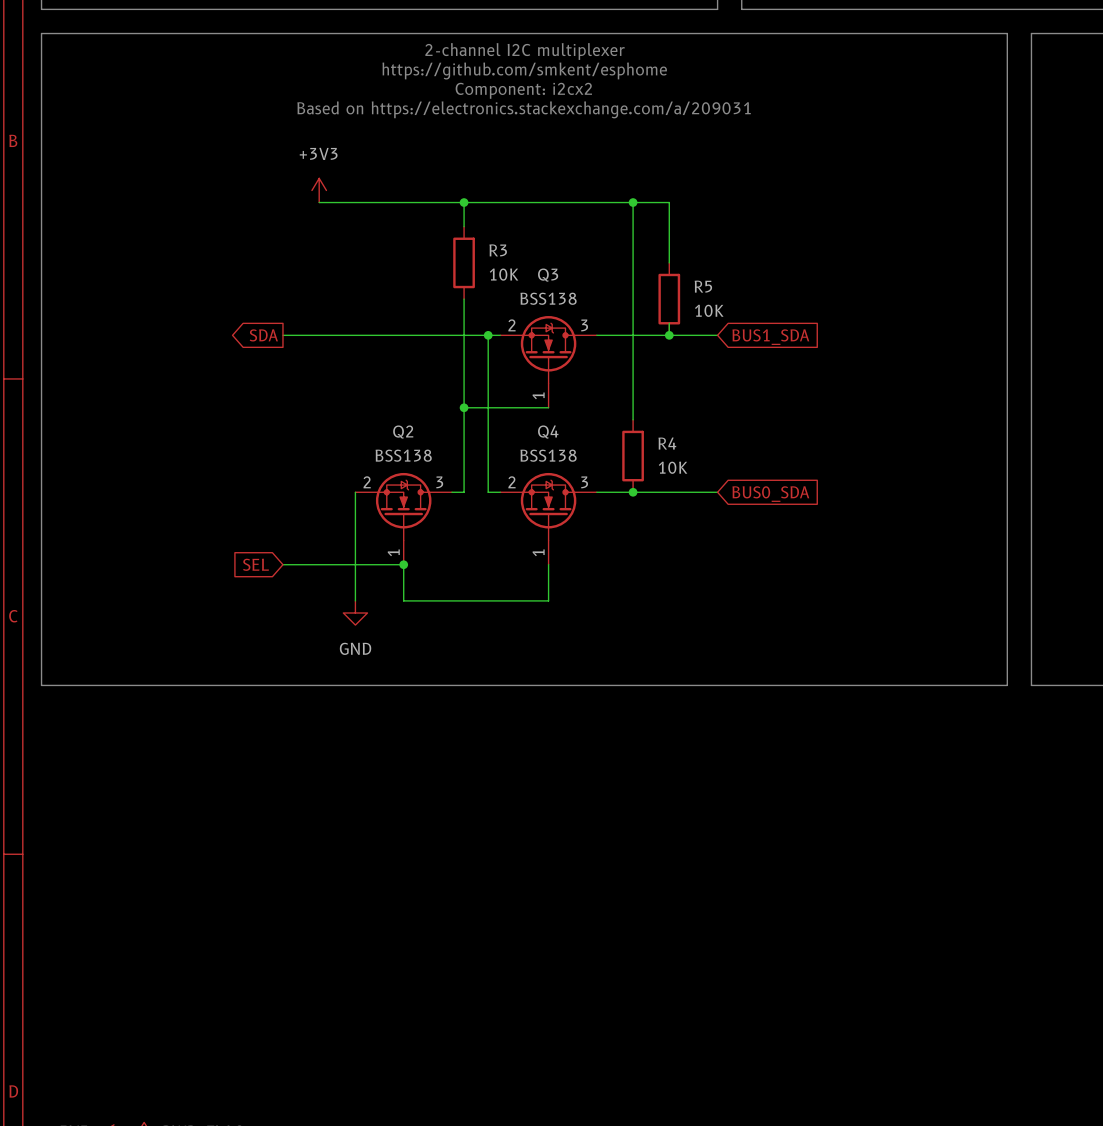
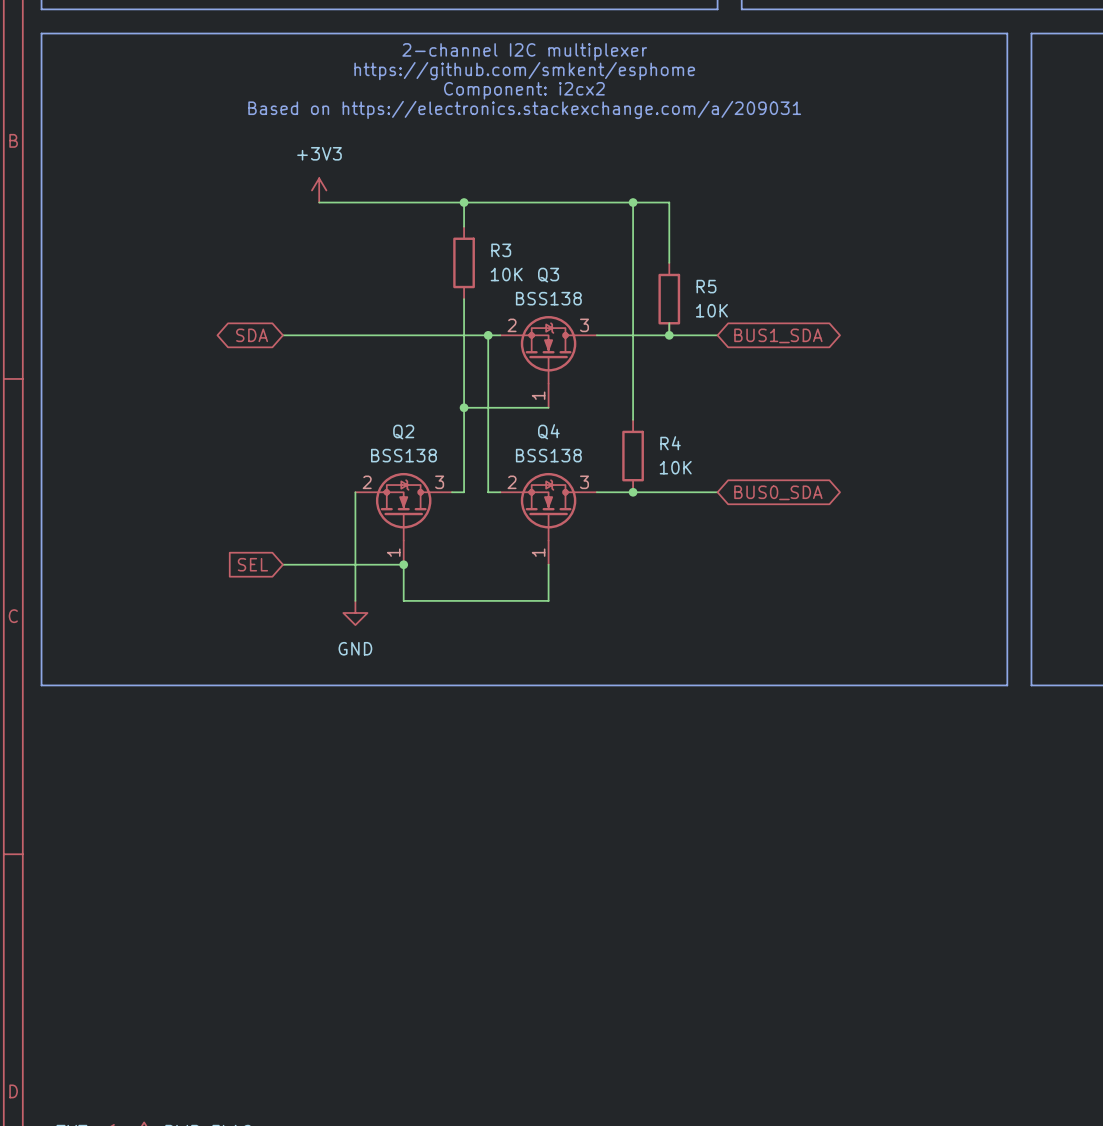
global label shape: output (263, 335) -> bidirectional (252, 335)
global label shape: input (770, 337) -> bidirectional (778, 335)
global label shape: input (770, 494) -> bidirectional (778, 492)

